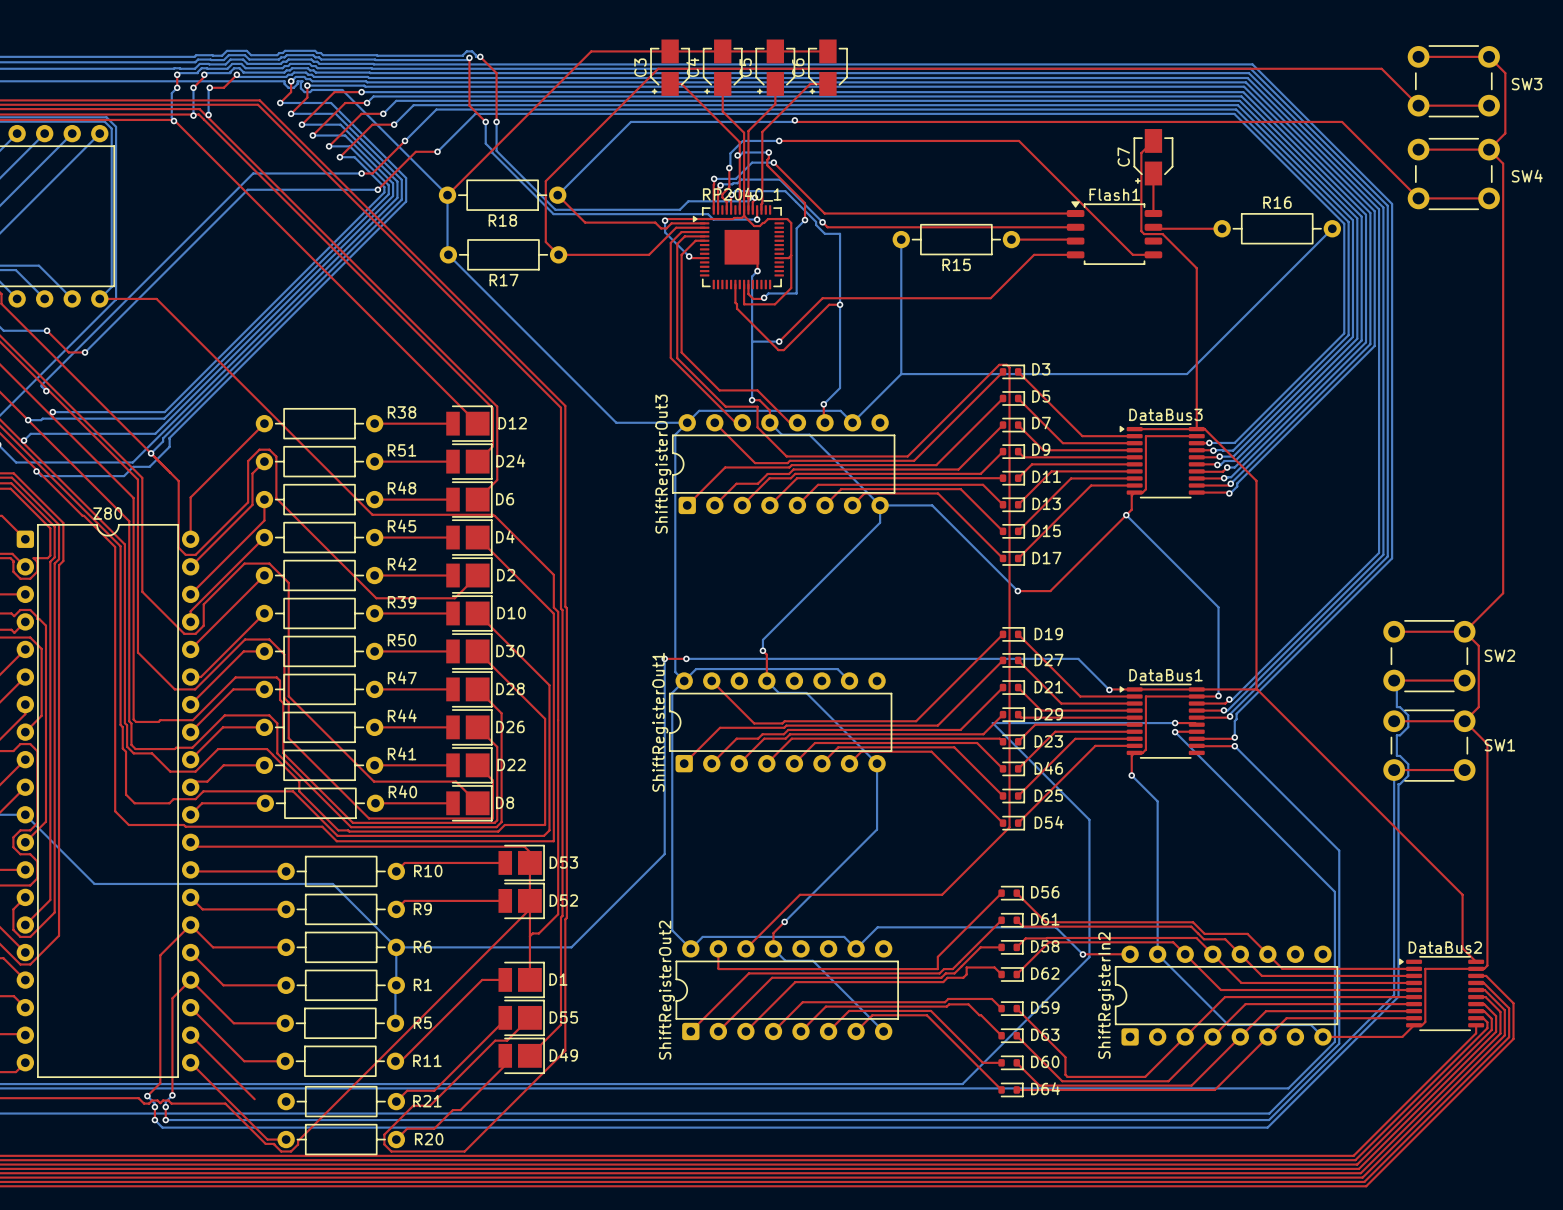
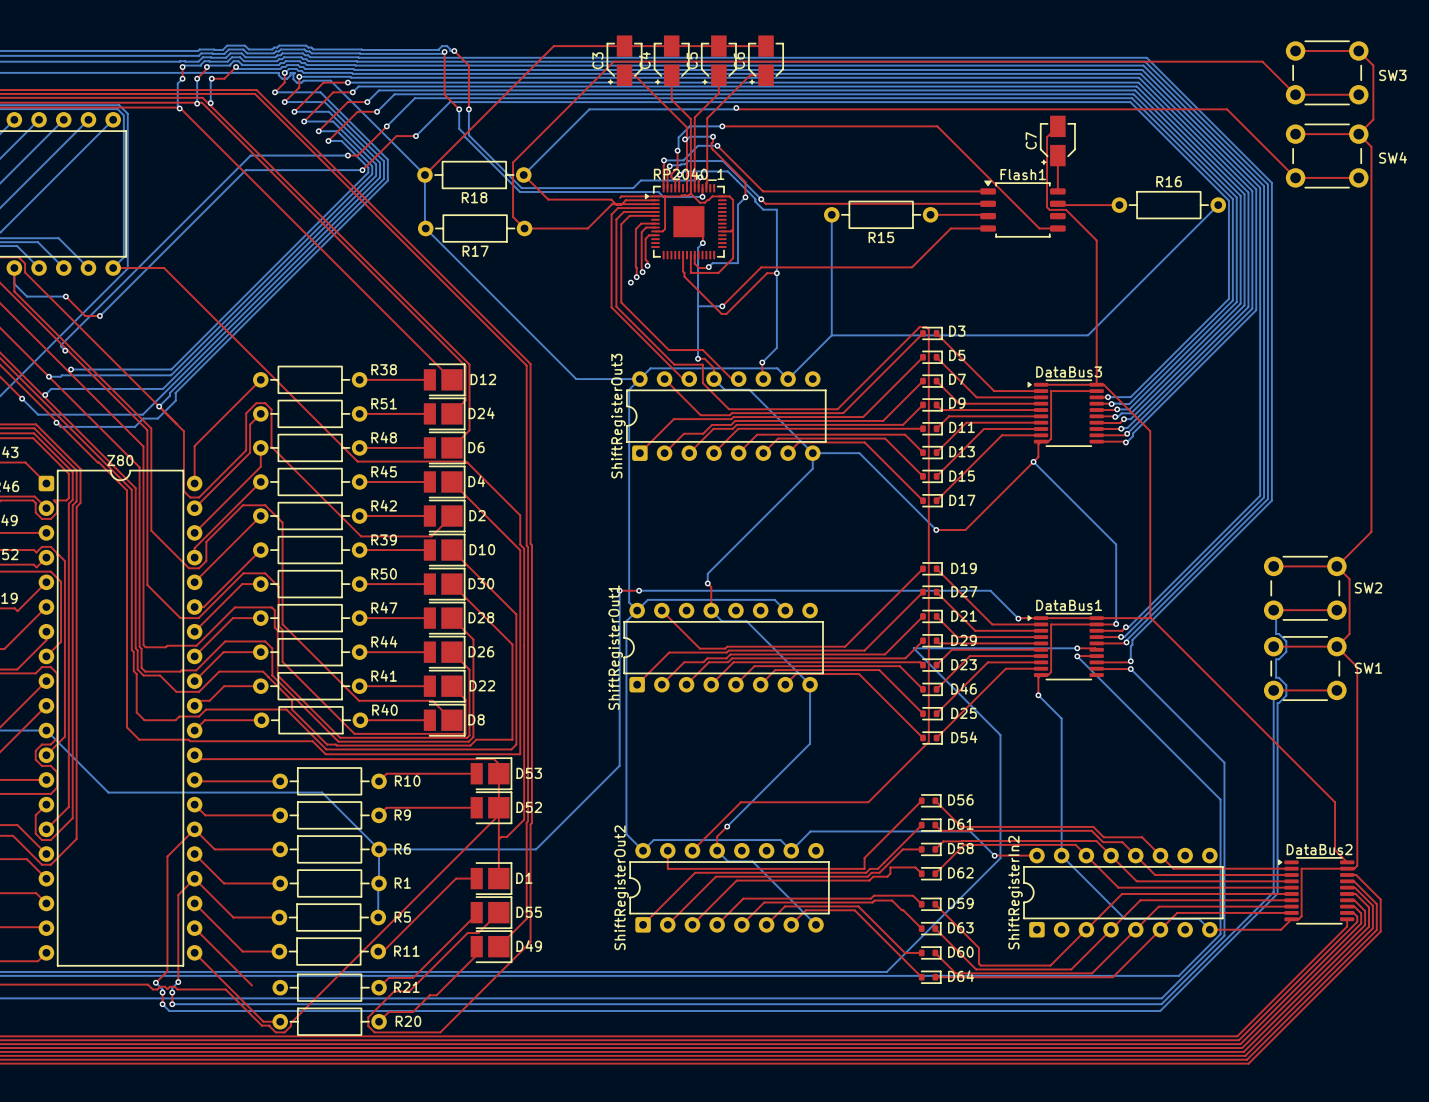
bottom track: (665, 220) (665, 232) (689, 256) -> none
via: (665, 220) -> none
top track: (676, 227) (649, 254) (629, 254) -> (629, 204) (612, 204) (587, 228)
top track: (681, 232) (670, 242) (670, 357) -> (634, 208) (618, 208) (611, 214) (611, 307) (625, 320)
top track: (684, 236) (677, 244) (677, 358) -> (637, 211) (623, 211) (616, 219) (616, 306) (630, 321)
top track: (695, 240) (681, 254) (681, 352) -> (647, 215) (629, 215) (621, 224) (621, 302) (634, 316)
top track: none -> (655, 223) (641, 223) (635, 229) (636, 277)
top track: none -> (655, 227) (646, 227) (641, 232) (642, 272)
top track: (689, 256) (704, 258) -> (665, 196) (665, 229) (662, 231) (655, 231)
via: (689, 256) -> none
top track: none -> (655, 235) (649, 235) (645, 238) (645, 259) (647, 265)
via: none -> (647, 265)
via: none -> (642, 272)
via: none -> (636, 277)
via: none -> (630, 282)

